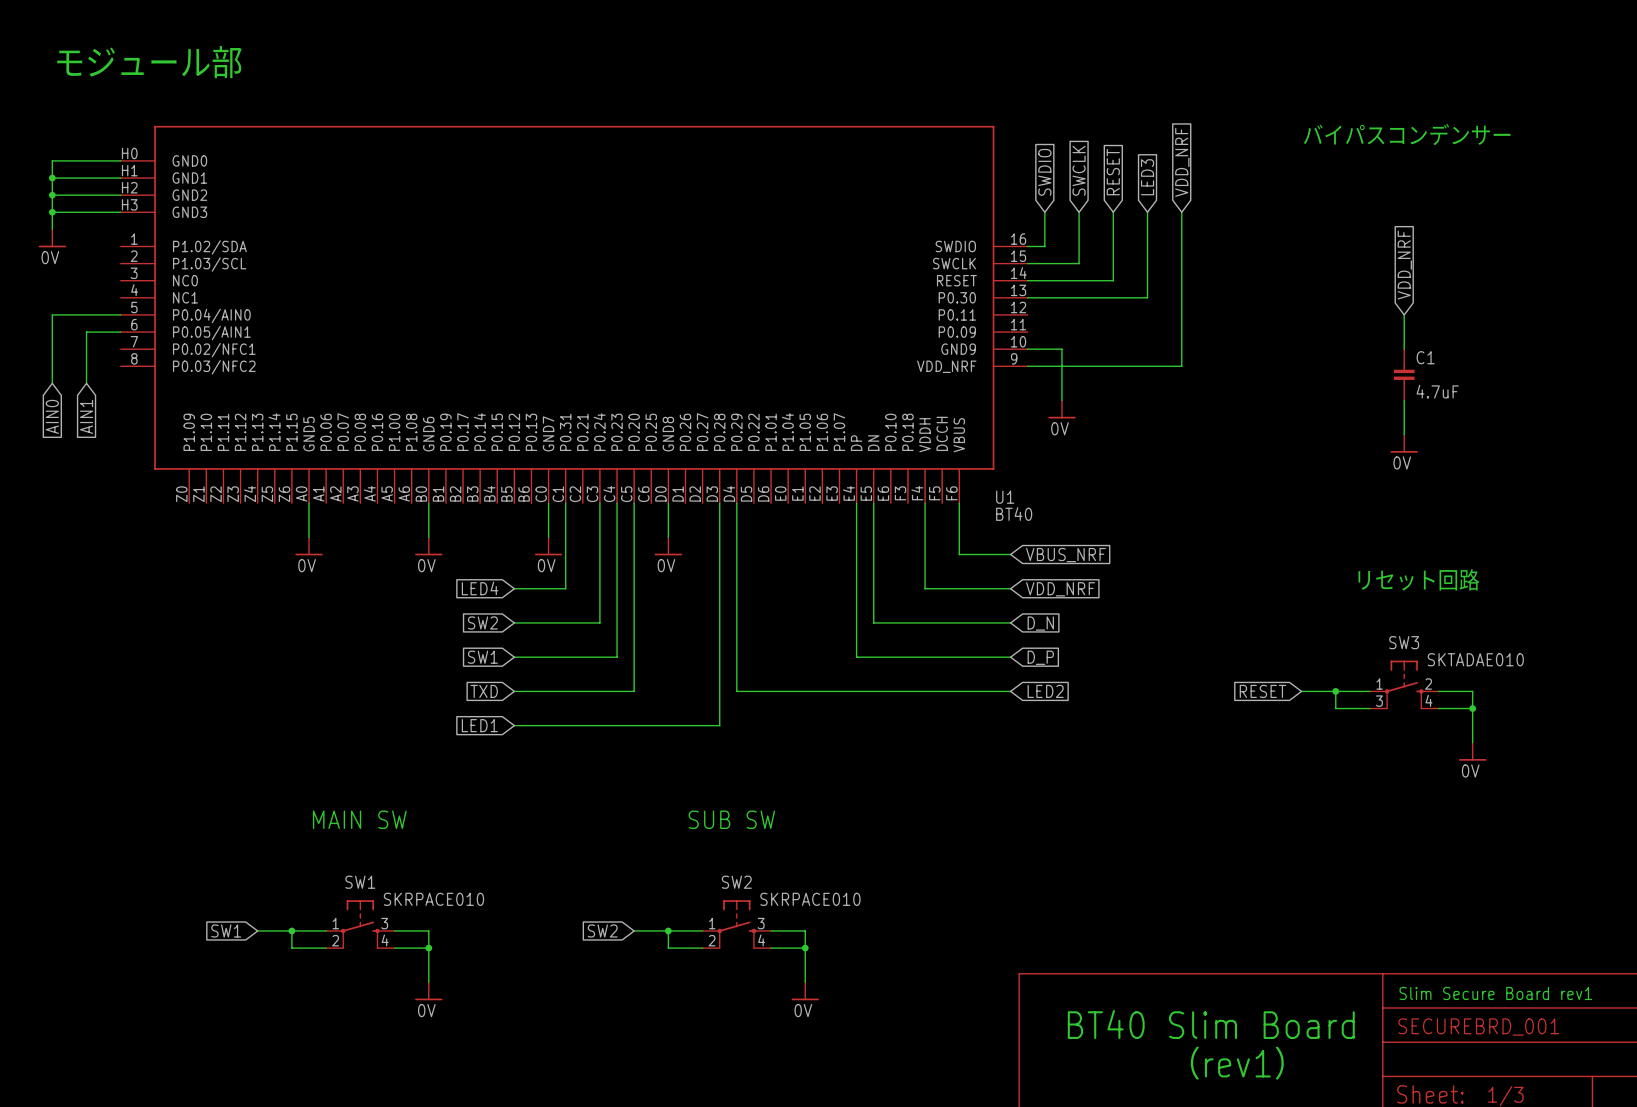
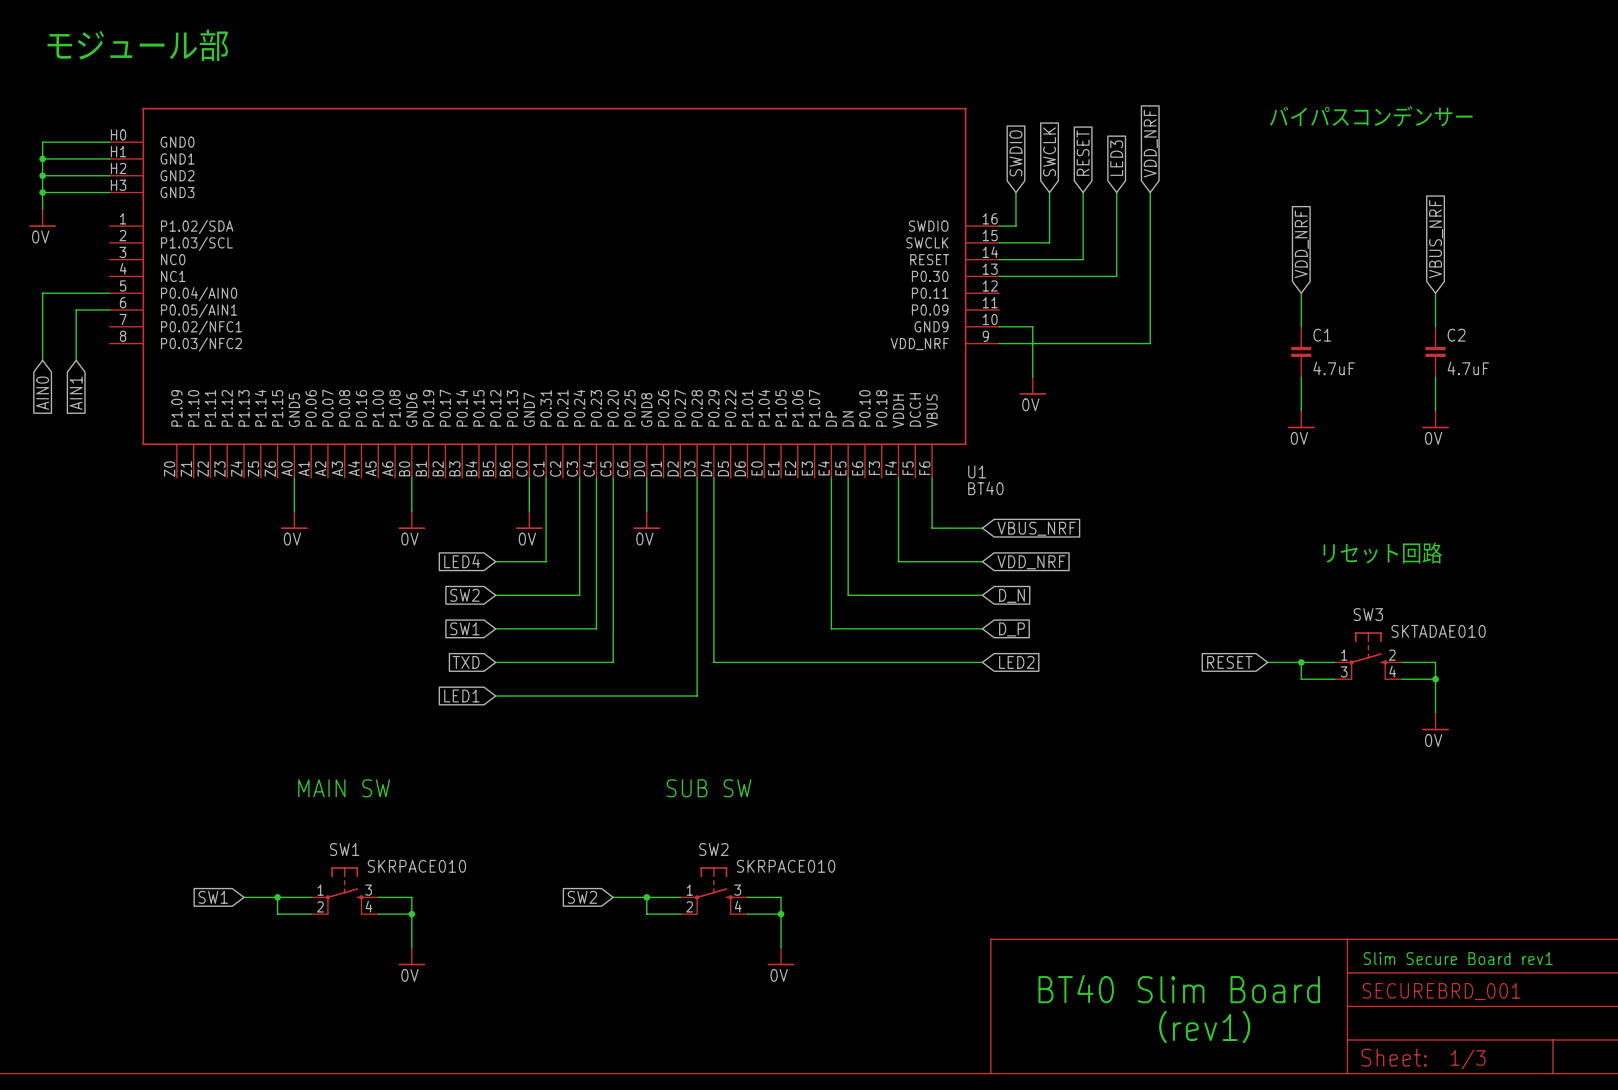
global label: none -> VBUS_NRF (1436, 238)
global label position: VDD_NRF (1404, 265) -> VDD_NRF (1301, 244)
wire: (1404, 314) (1404, 349) -> (1301, 293) (1301, 326)
wire: none -> (1435, 293) (1435, 326)
C1 position: (1404, 374) -> (1301, 351)
C2: none -> 4.7uF (1435, 351)
wire: (1404, 400) (1404, 434) -> (1301, 377) (1301, 410)
wire: none -> (1435, 377) (1435, 410)
power symbol: none -> 0V (1301, 419)
power symbol: 0V (1404, 443) -> none
power symbol: none -> 0V (1435, 419)

